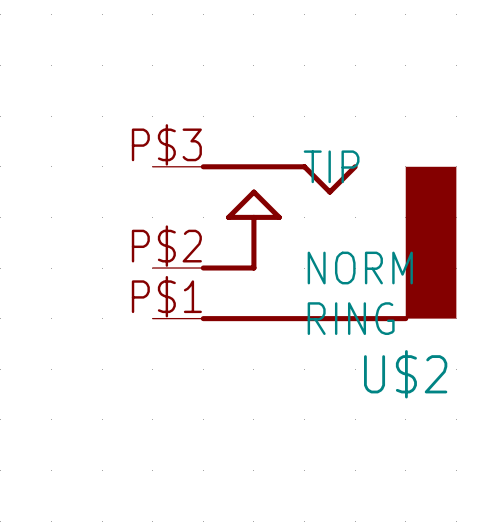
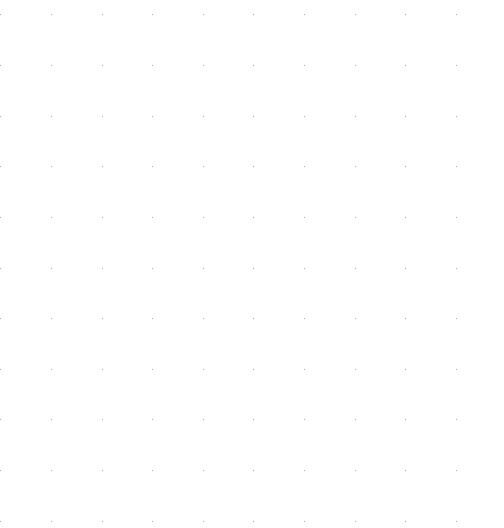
U$2: (304, 242) -> none

